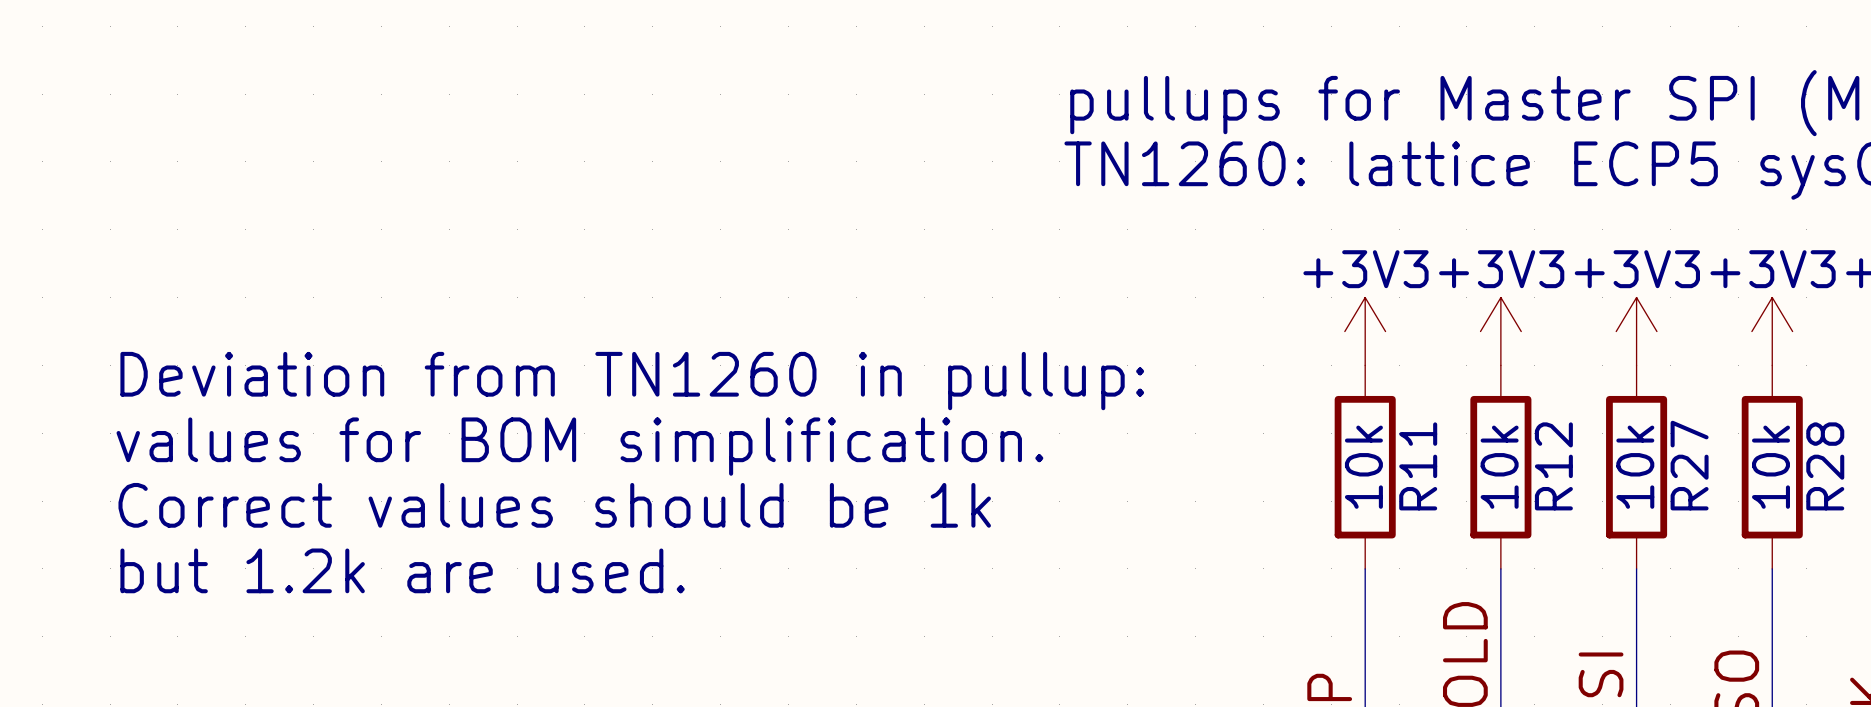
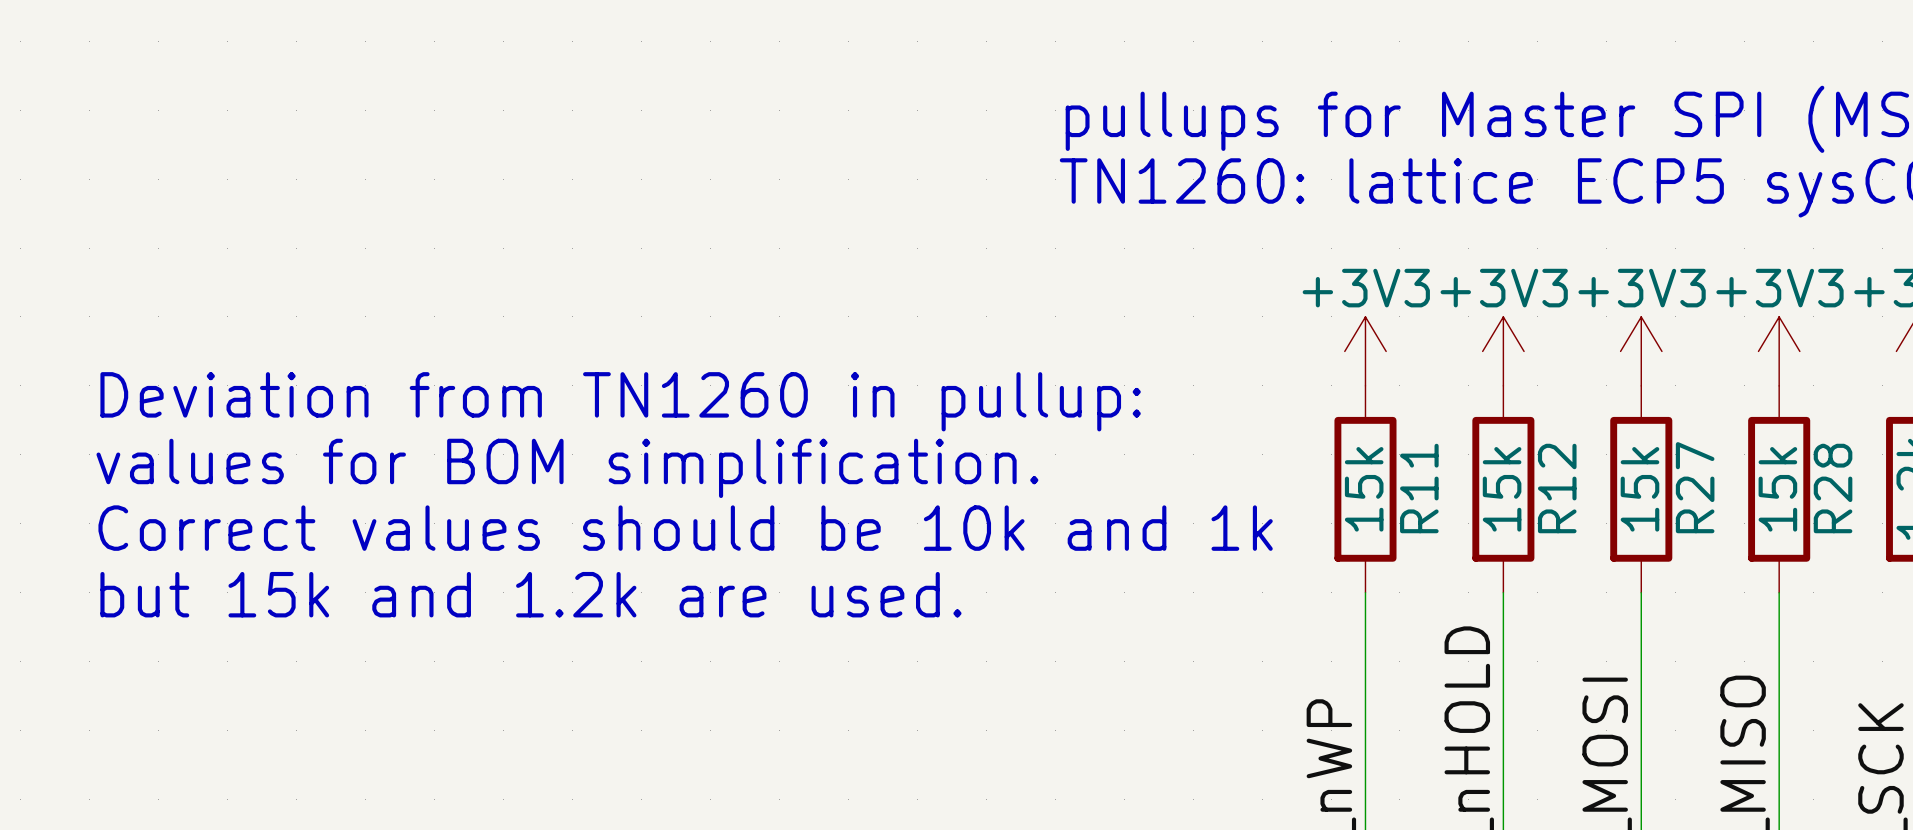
R11 value: 10k (1363, 467) -> 15k (1364, 489)
R12 value: 10k (1499, 467) -> 15k (1502, 489)
R27 value: 10k (1635, 467) -> 15k (1639, 489)
R28 value: 10k (1770, 467) -> 15k (1777, 489)
text: Correct values should be 1k (554, 505) -> Correct values should be 10k and 1k (685, 528)
text: but 1.2k are used. (402, 570) -> but 15k and 1.2k are used. (530, 594)

